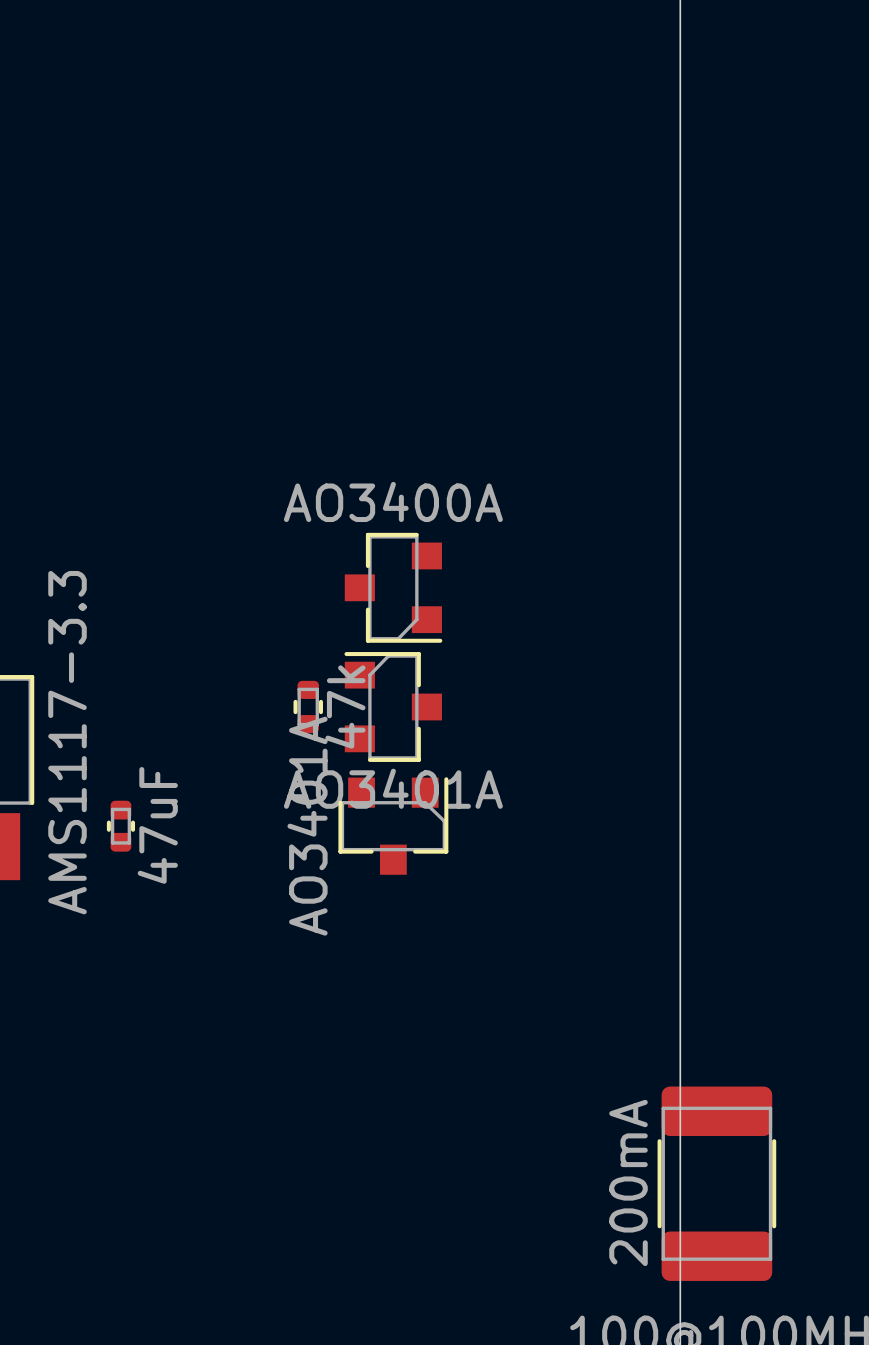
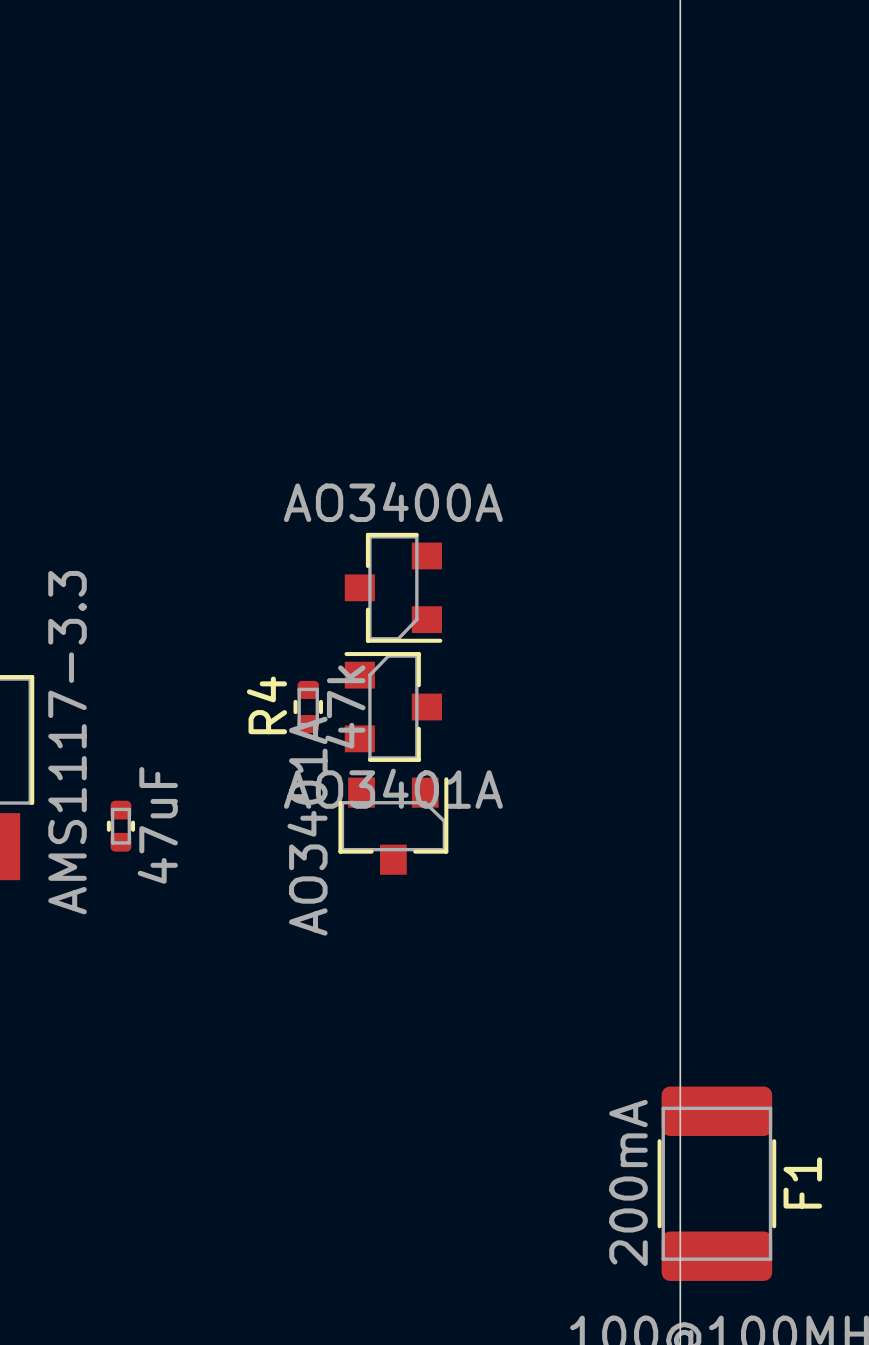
R4 name: none -> R4 (266, 705)
F1 name: none -> F1 (802, 1182)

